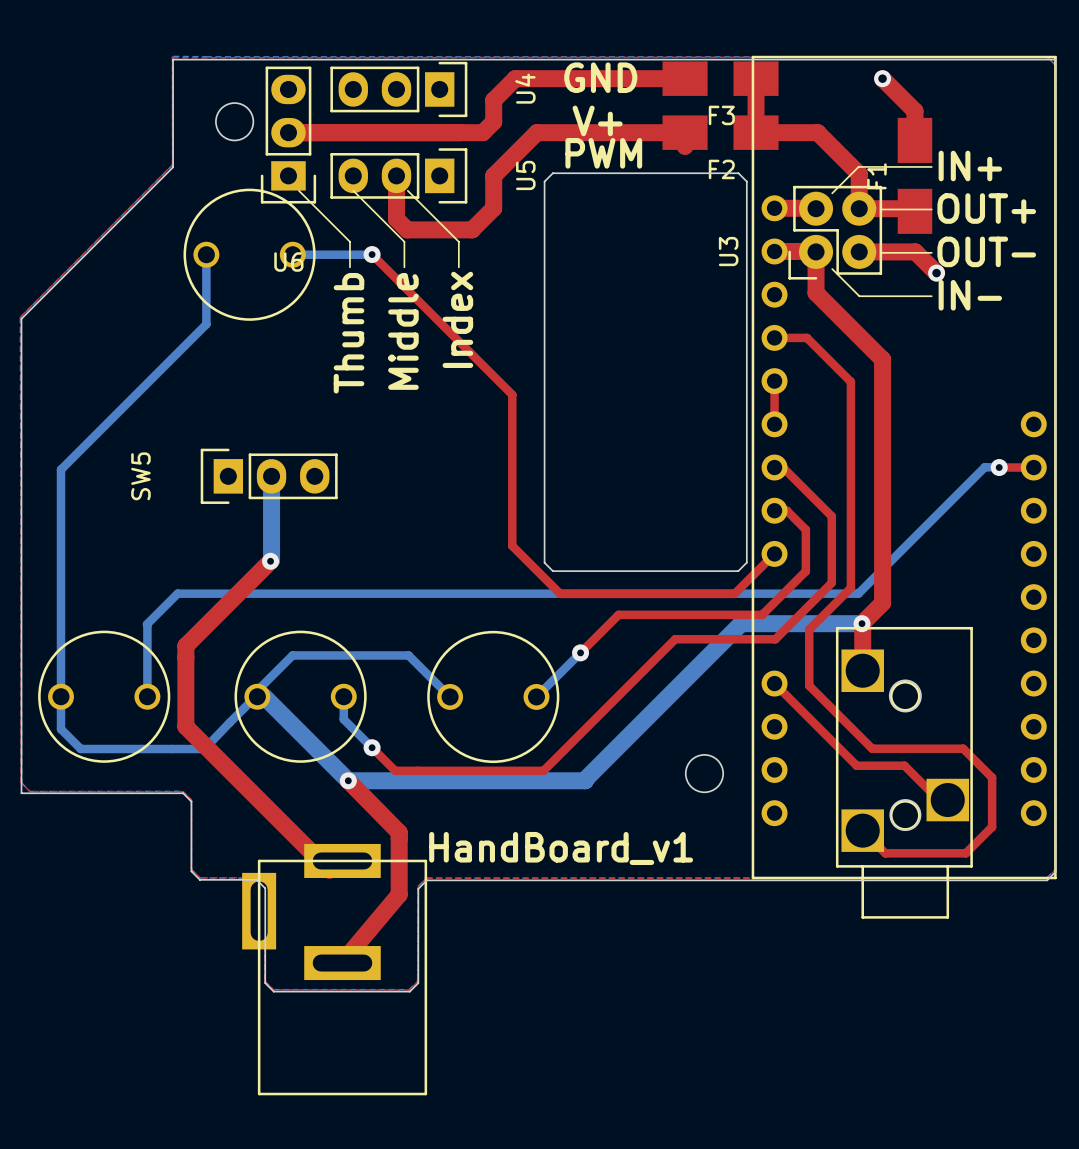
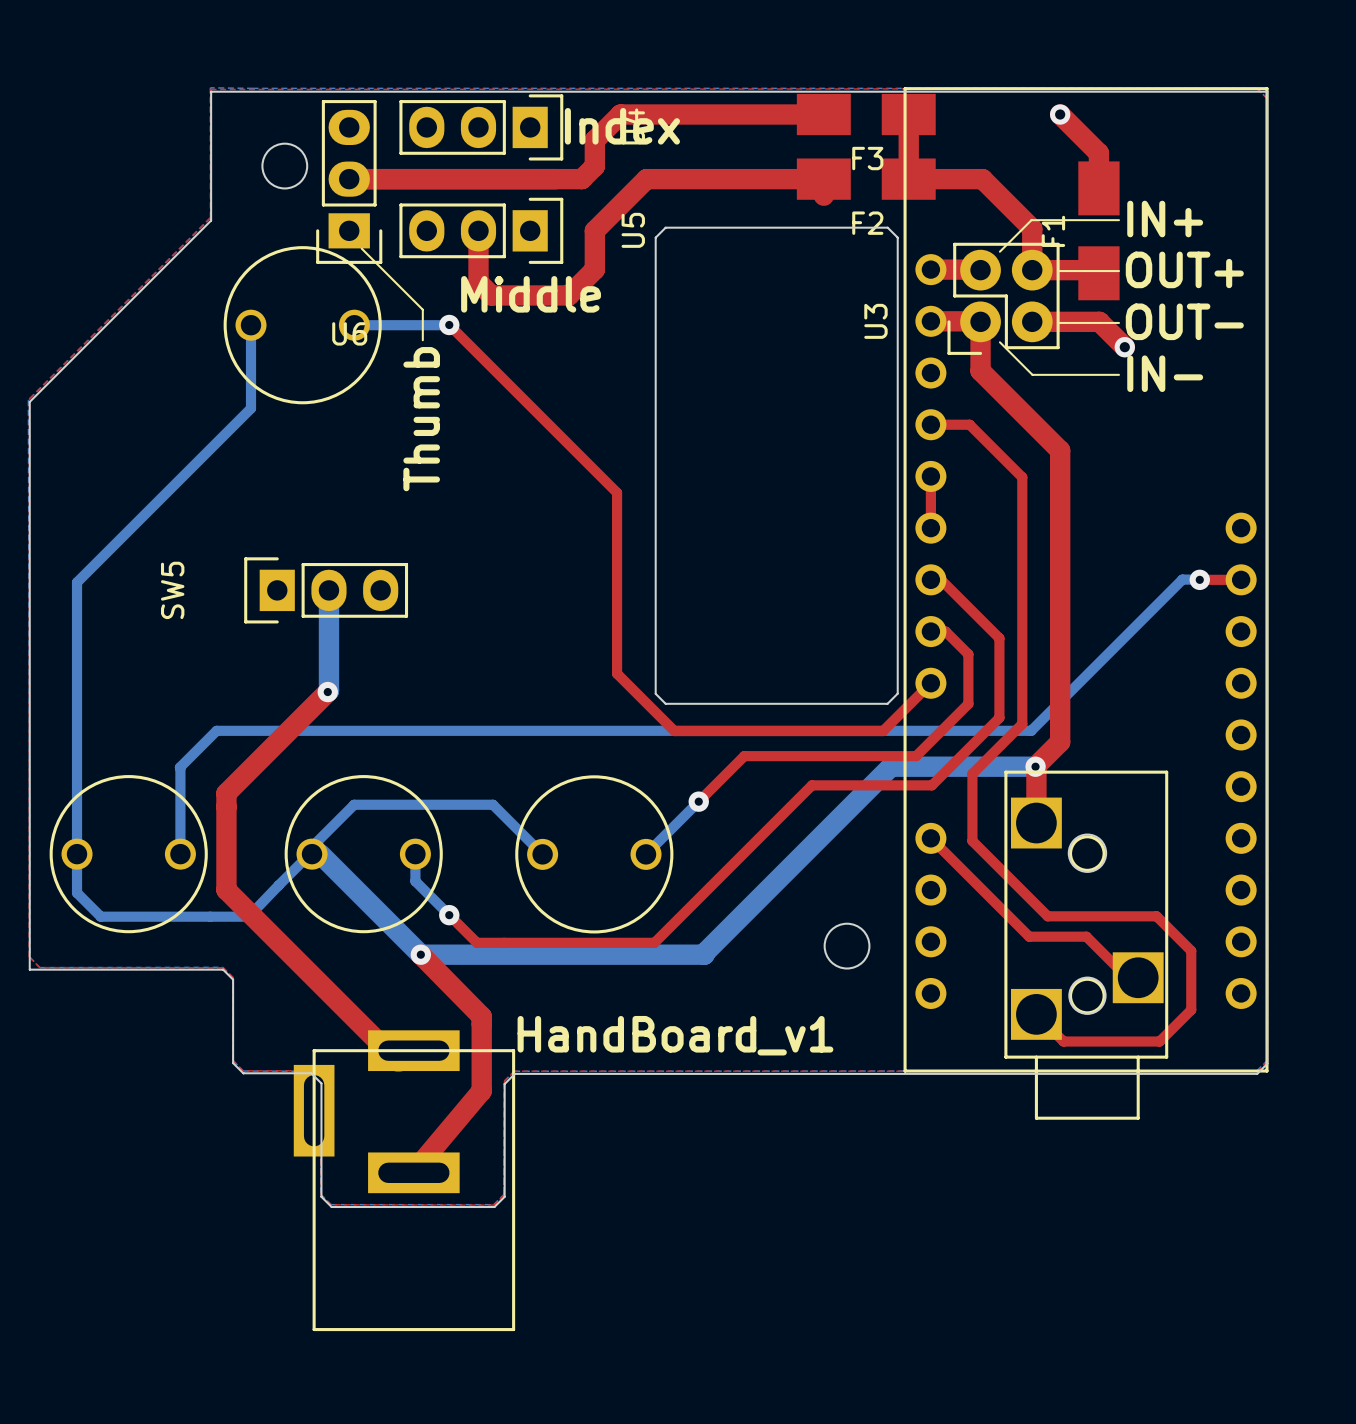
text: GND (600, 77) -> Index (622, 126)
text: V+ (597, 120) -> none
text: PWM (603, 153) -> none
line: (353, 190) (404, 241) (404, 267) -> none
line: (407, 190) (458, 241) (458, 267) -> none
text: Index (457, 319) -> none
text rotation: 0° (403, 331) -> 90° clockwise (531, 294)

